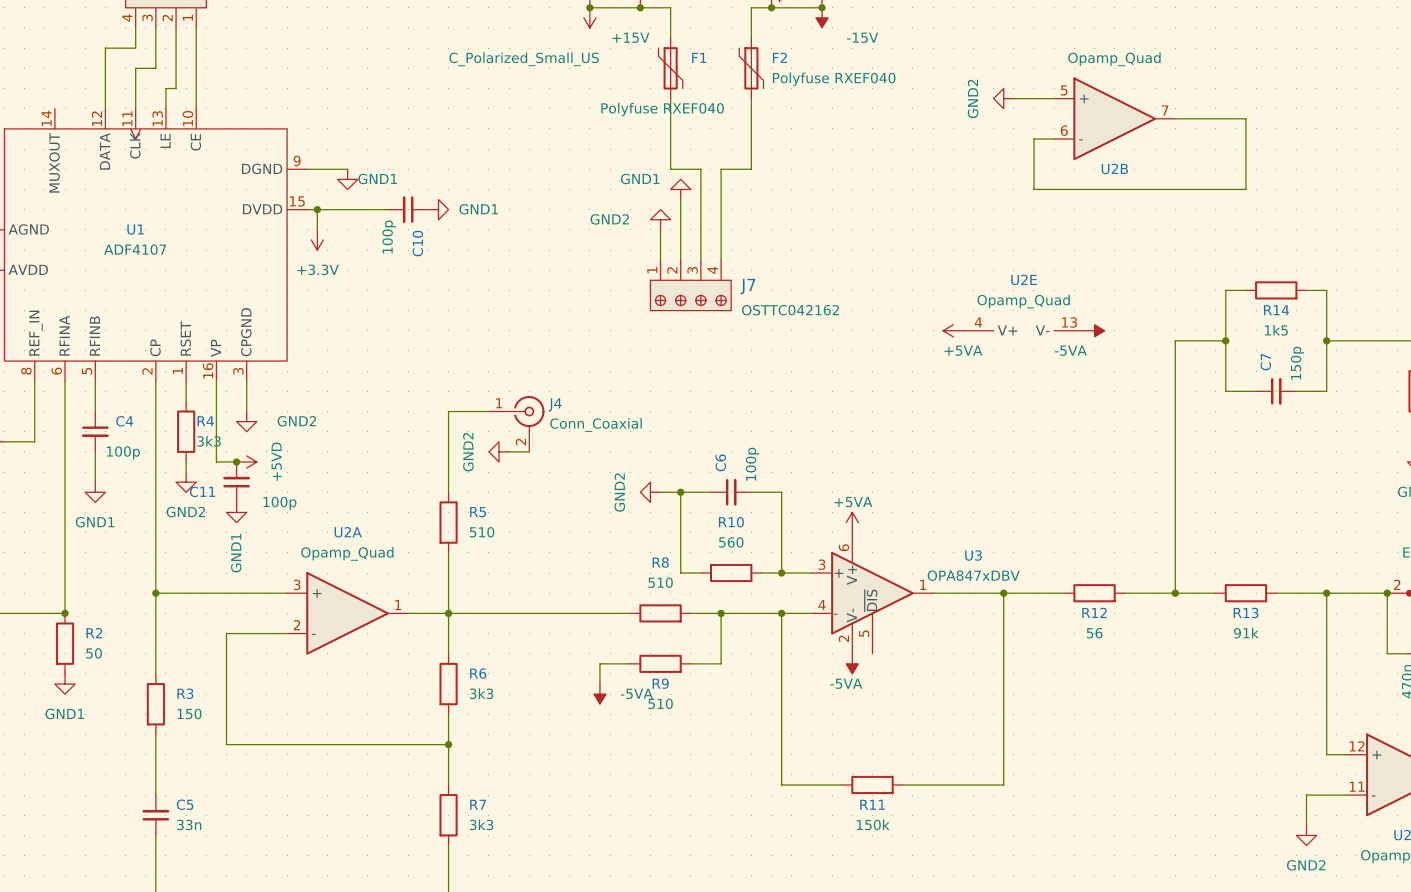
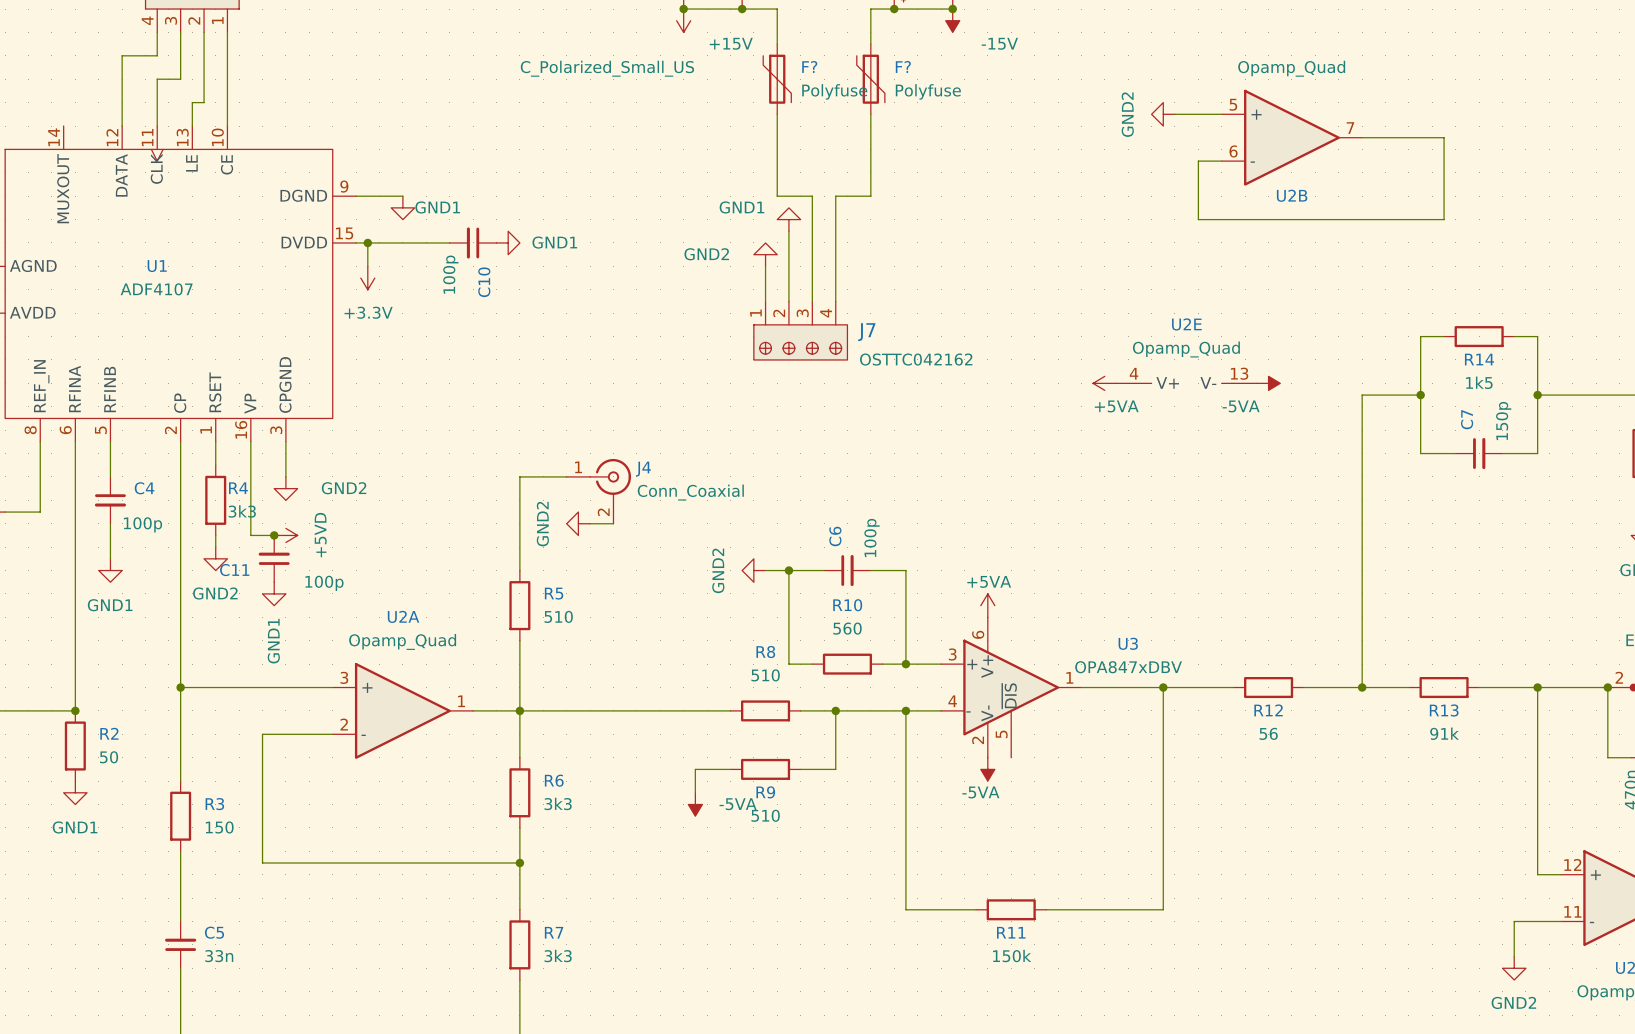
F1 name: F1 (699, 57) -> F? (809, 66)
F2 name: F2 (779, 57) -> F? (903, 66)
F2 value: Polyfuse RXEF040 (834, 79) -> Polyfuse (928, 91)
F1 value: Polyfuse RXEF040 (662, 109) -> Polyfuse (834, 91)

